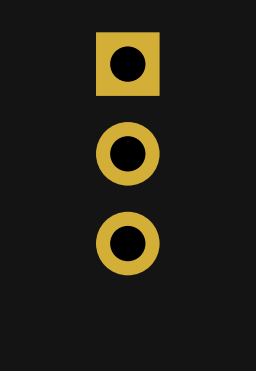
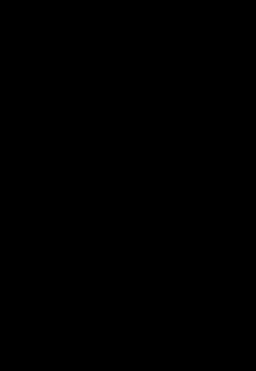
part: (127, 153) -> none

